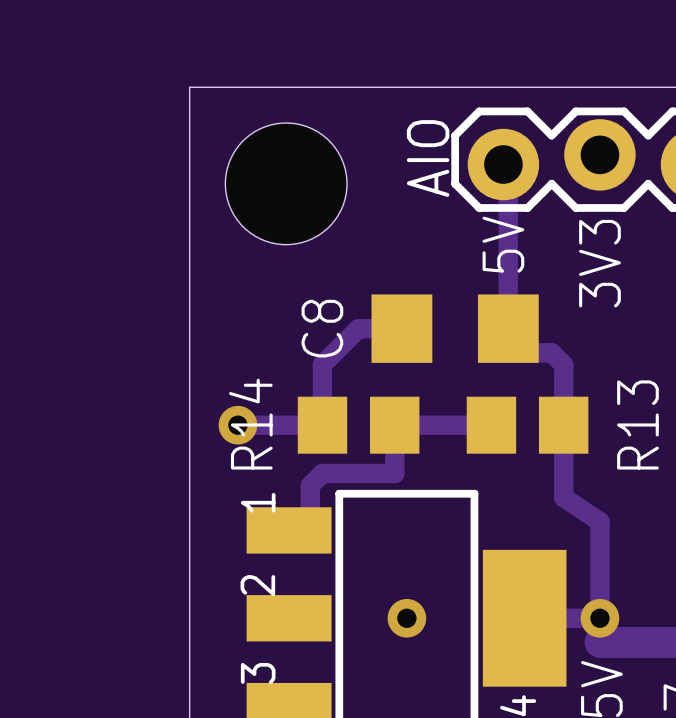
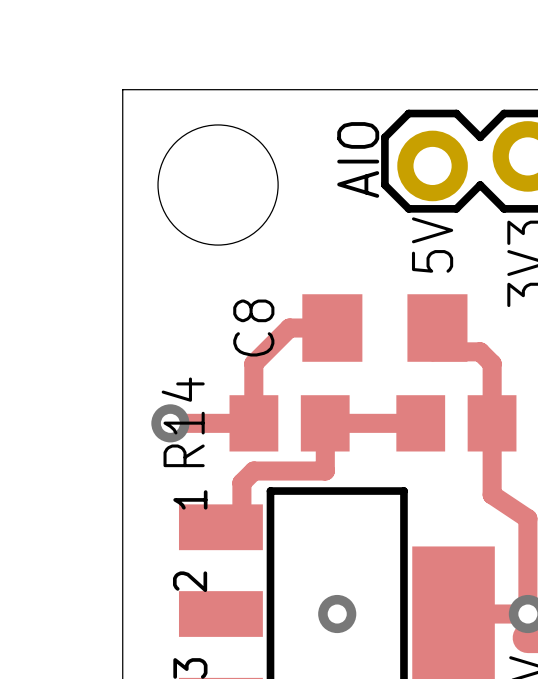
track: (503, 164) (508, 164) (508, 328) -> none

